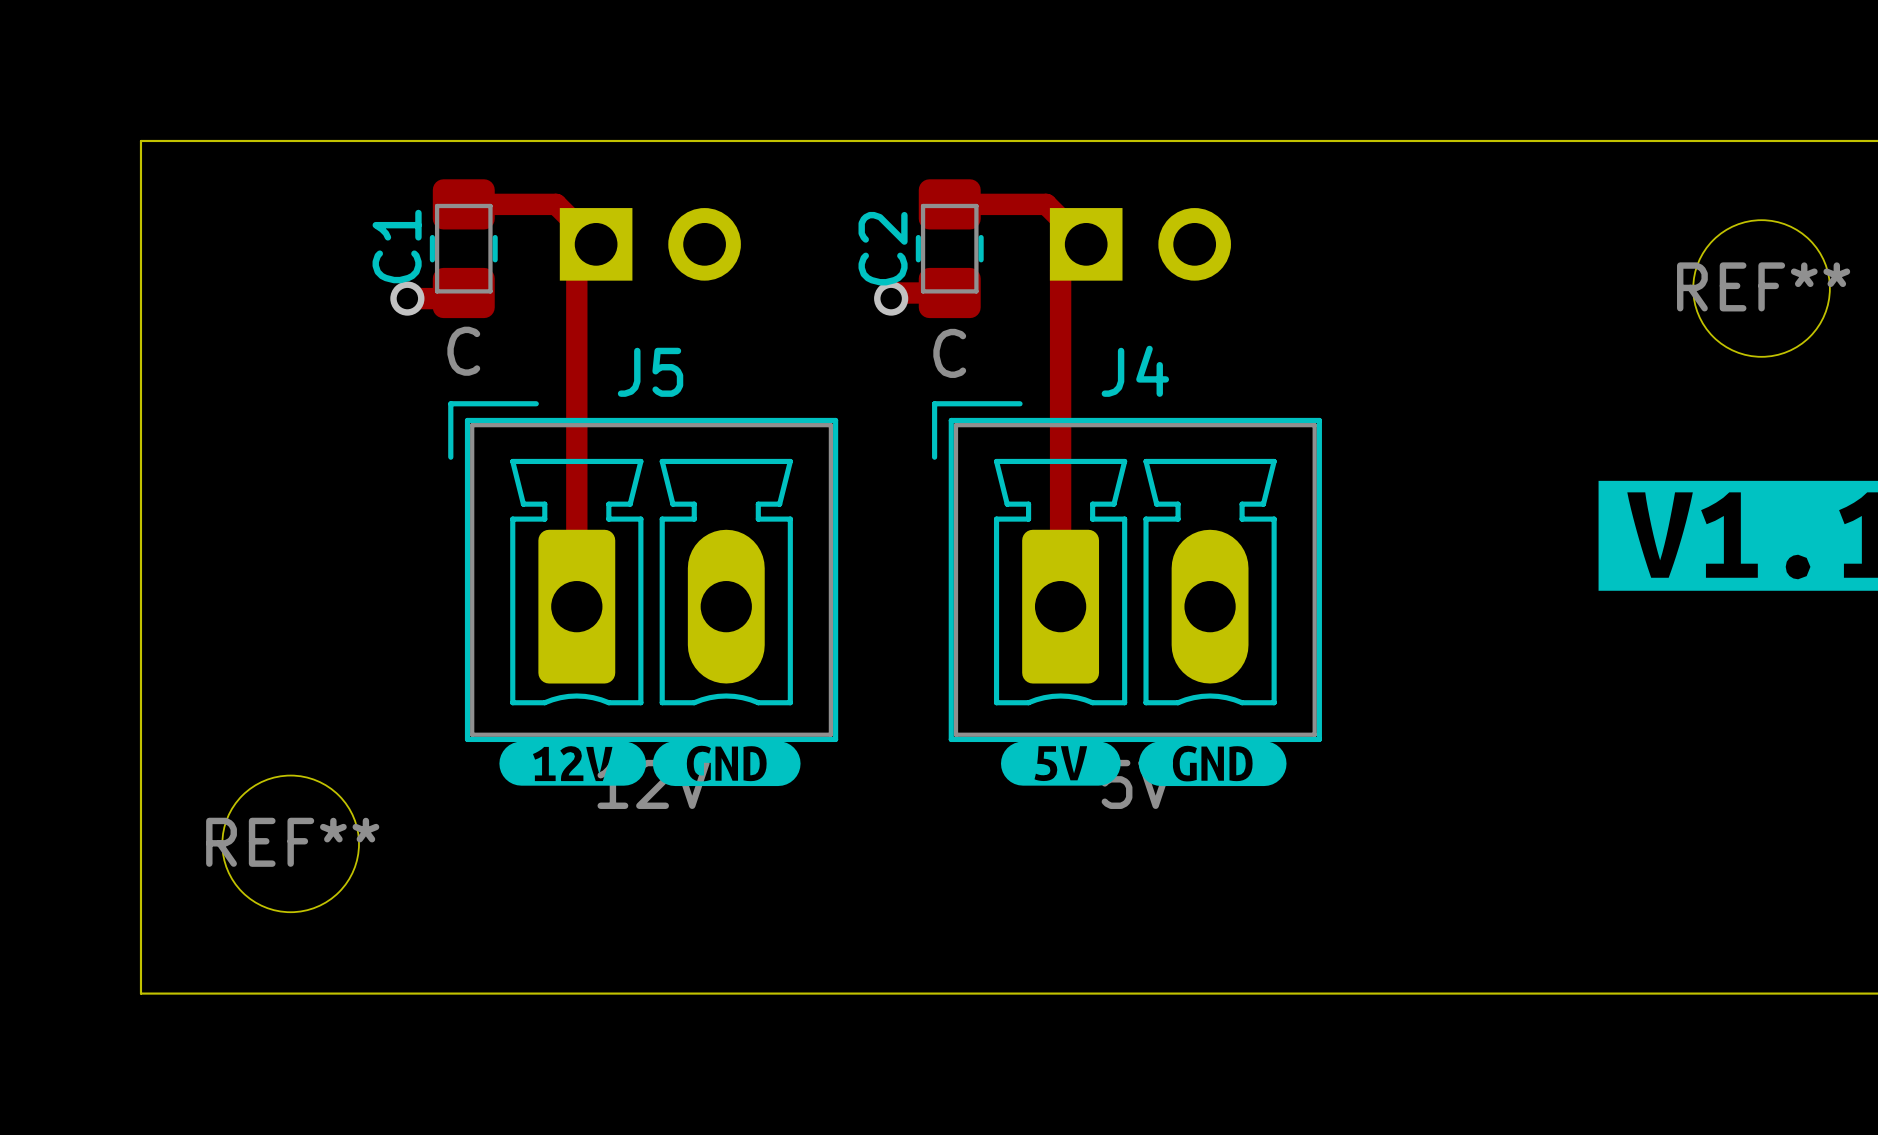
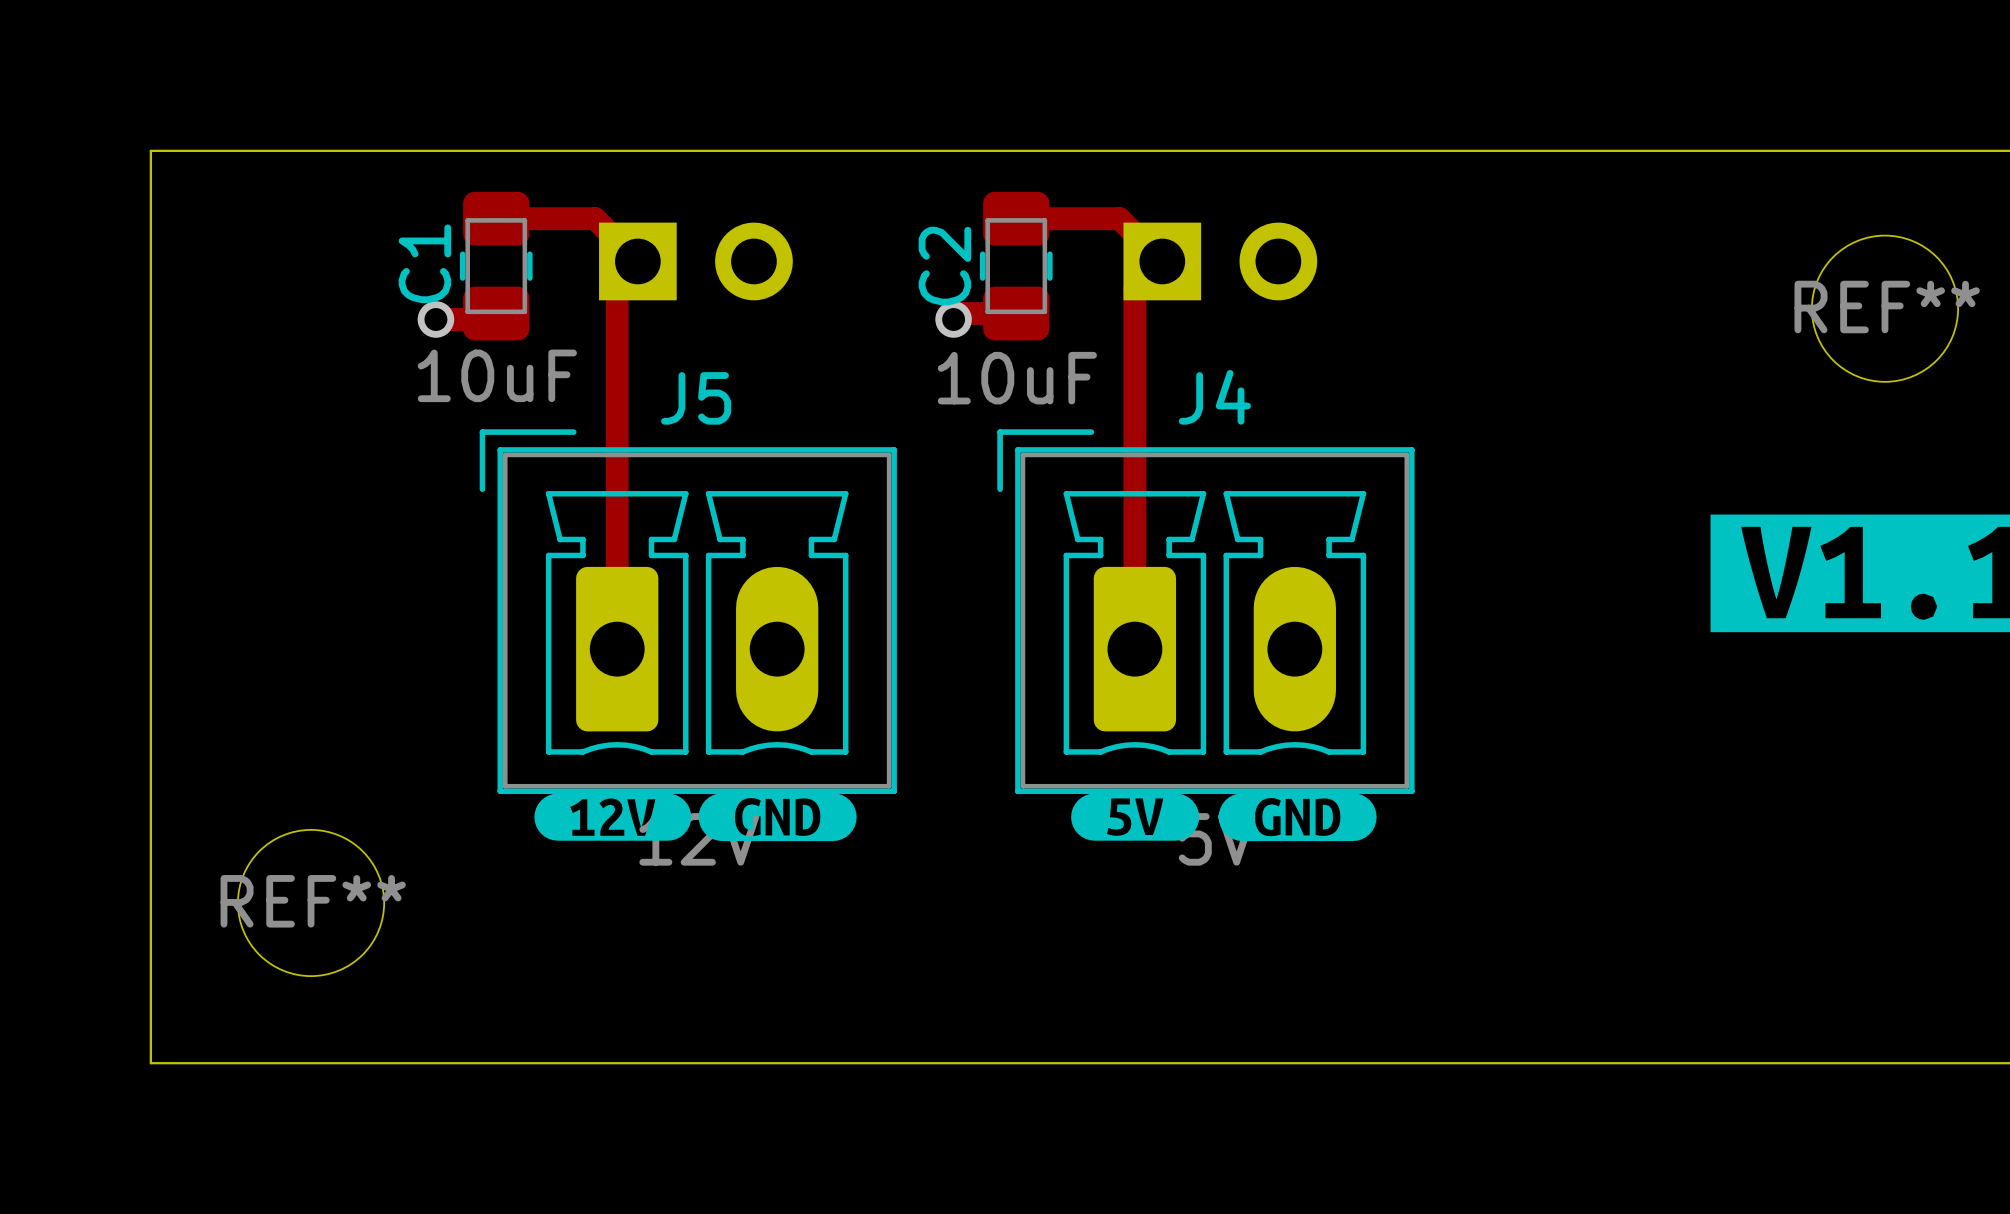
C1 value: C (463, 351) -> 10uF (497, 375)
C2 value: C (949, 353) -> 10uF (1017, 378)

